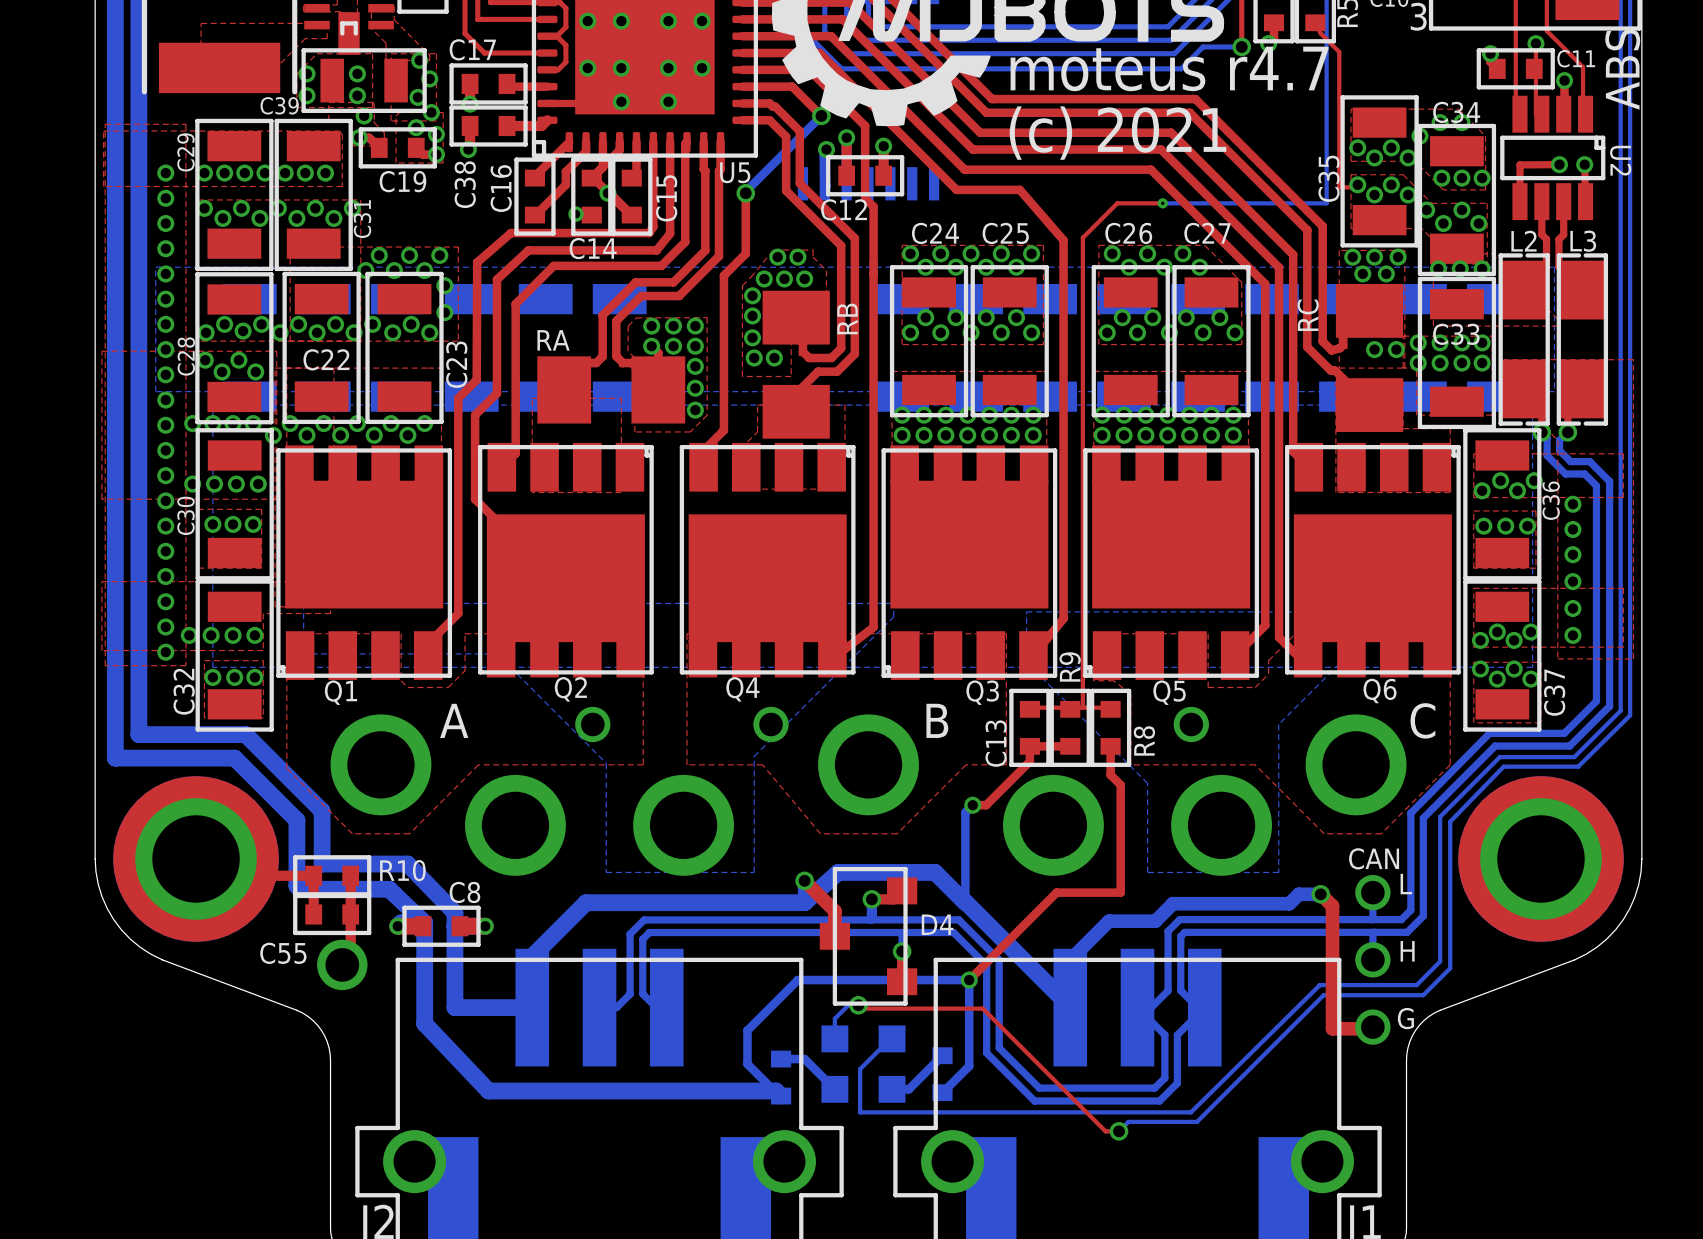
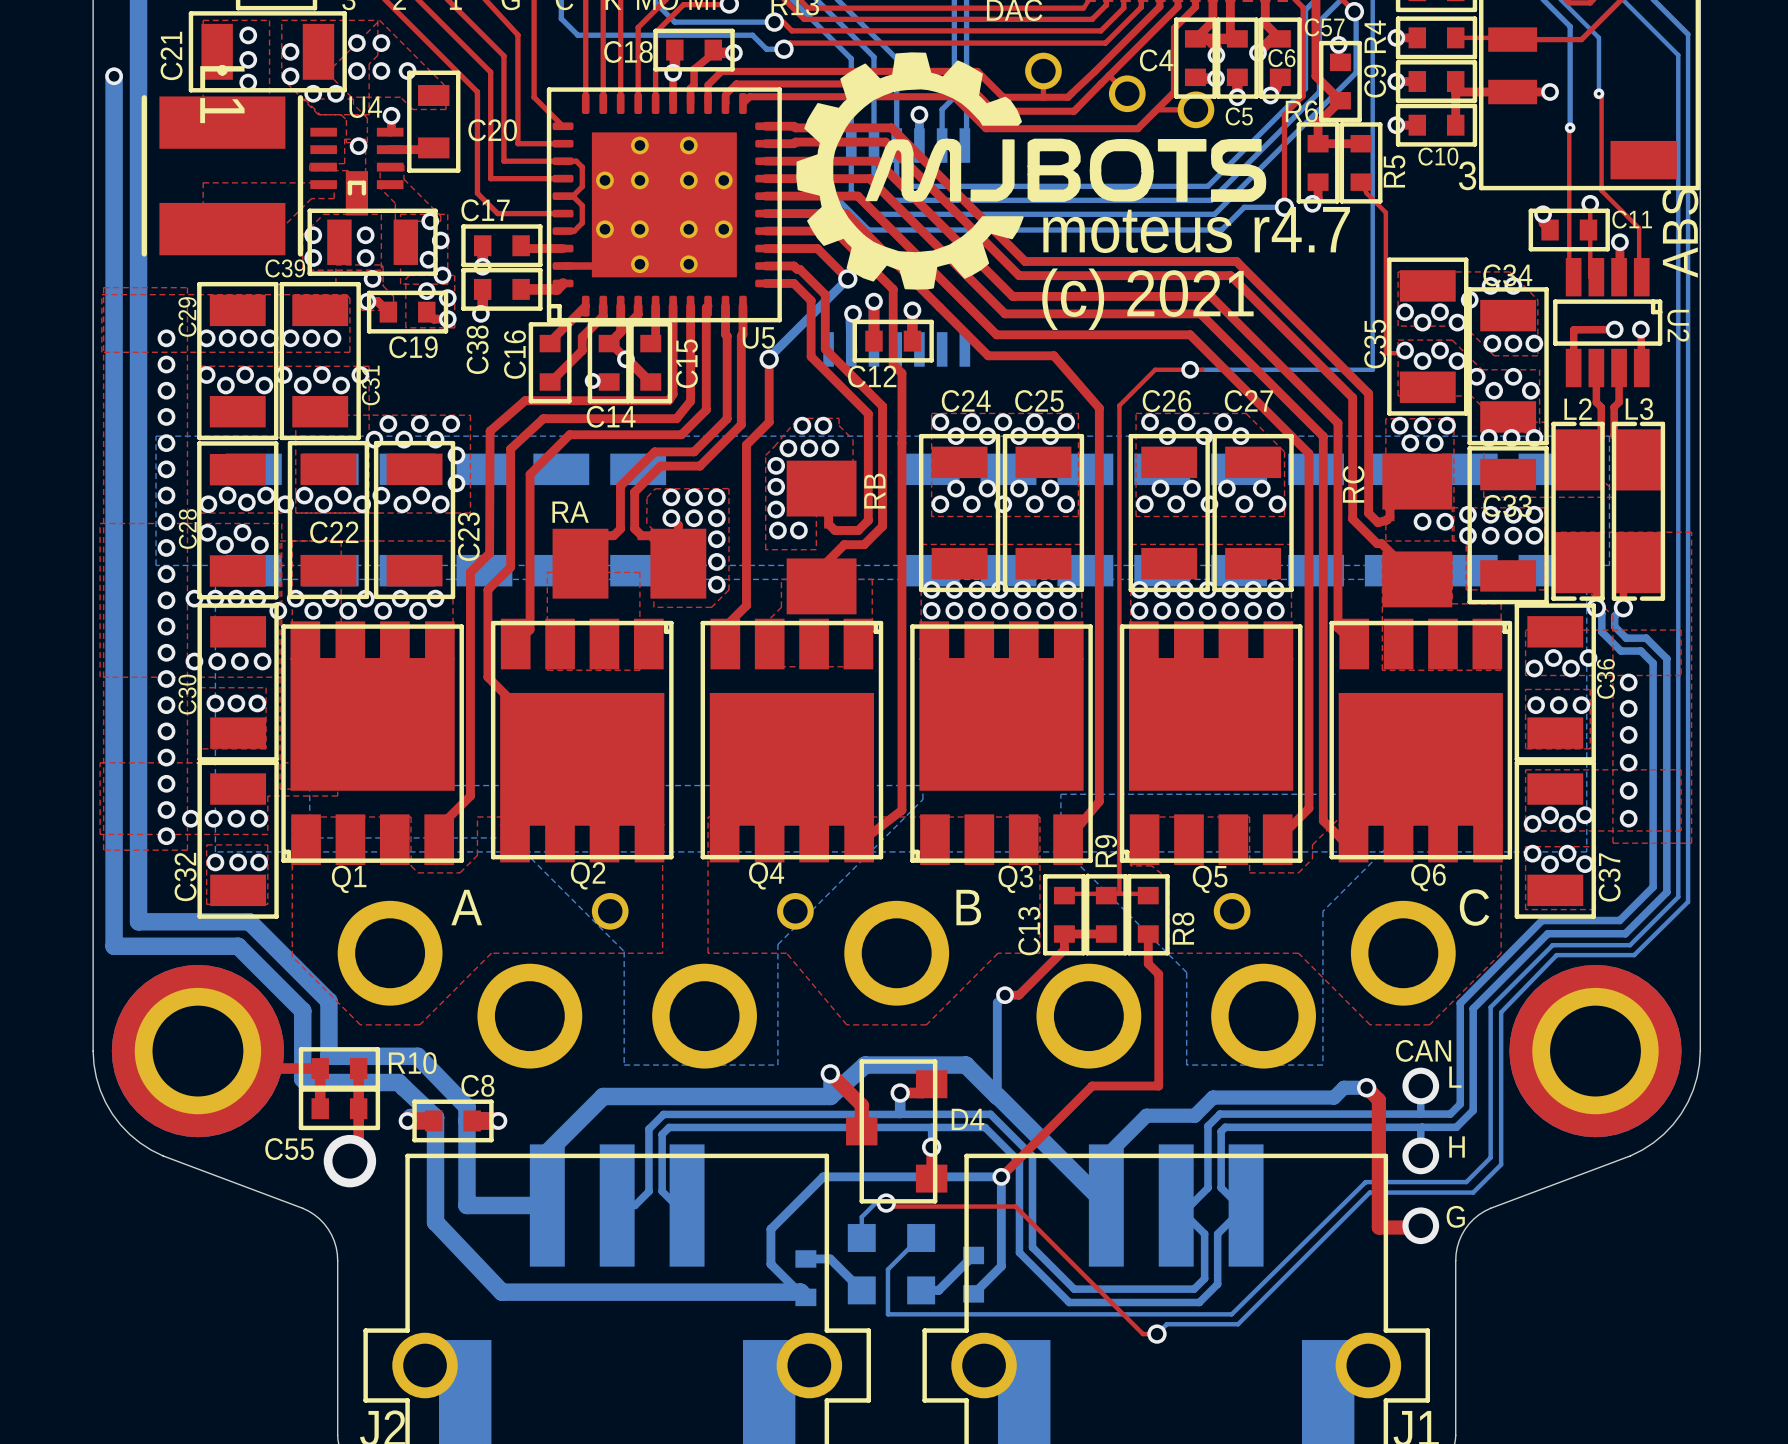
via size: [1157, 198, 1168, 209] -> [1181, 360, 1200, 379]

